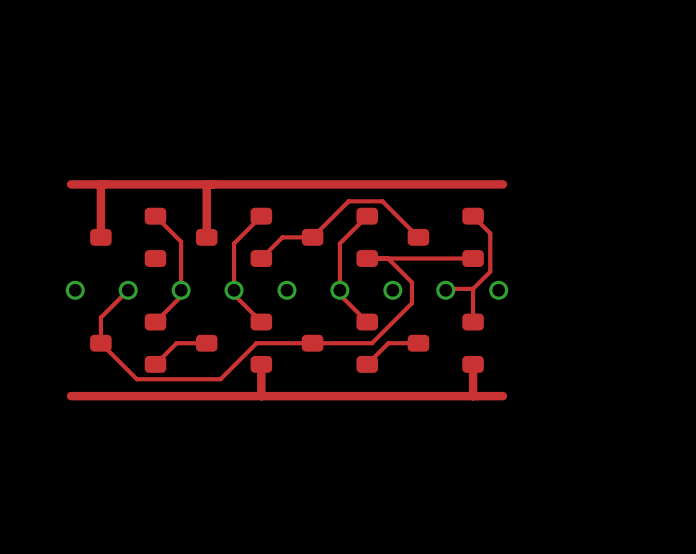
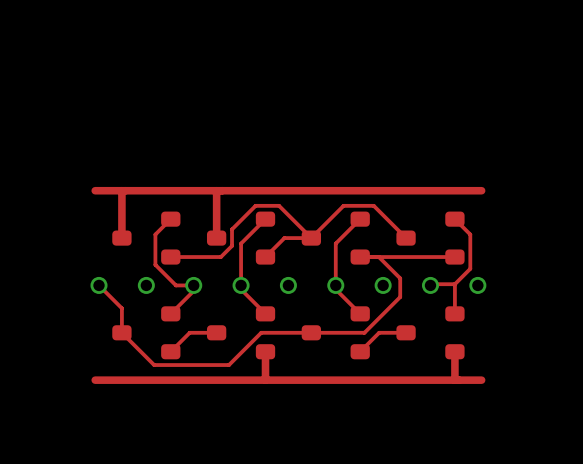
top track: (155, 216) (181, 241) (181, 290) -> (170, 219) (155, 234) (155, 264) (175, 285) (193, 285)
top track: none -> (311, 238) (279, 205) (255, 205) (232, 229) (232, 245) (220, 257) (170, 257)
top track: (128, 290) (100, 317) -> (99, 285) (121, 309)

